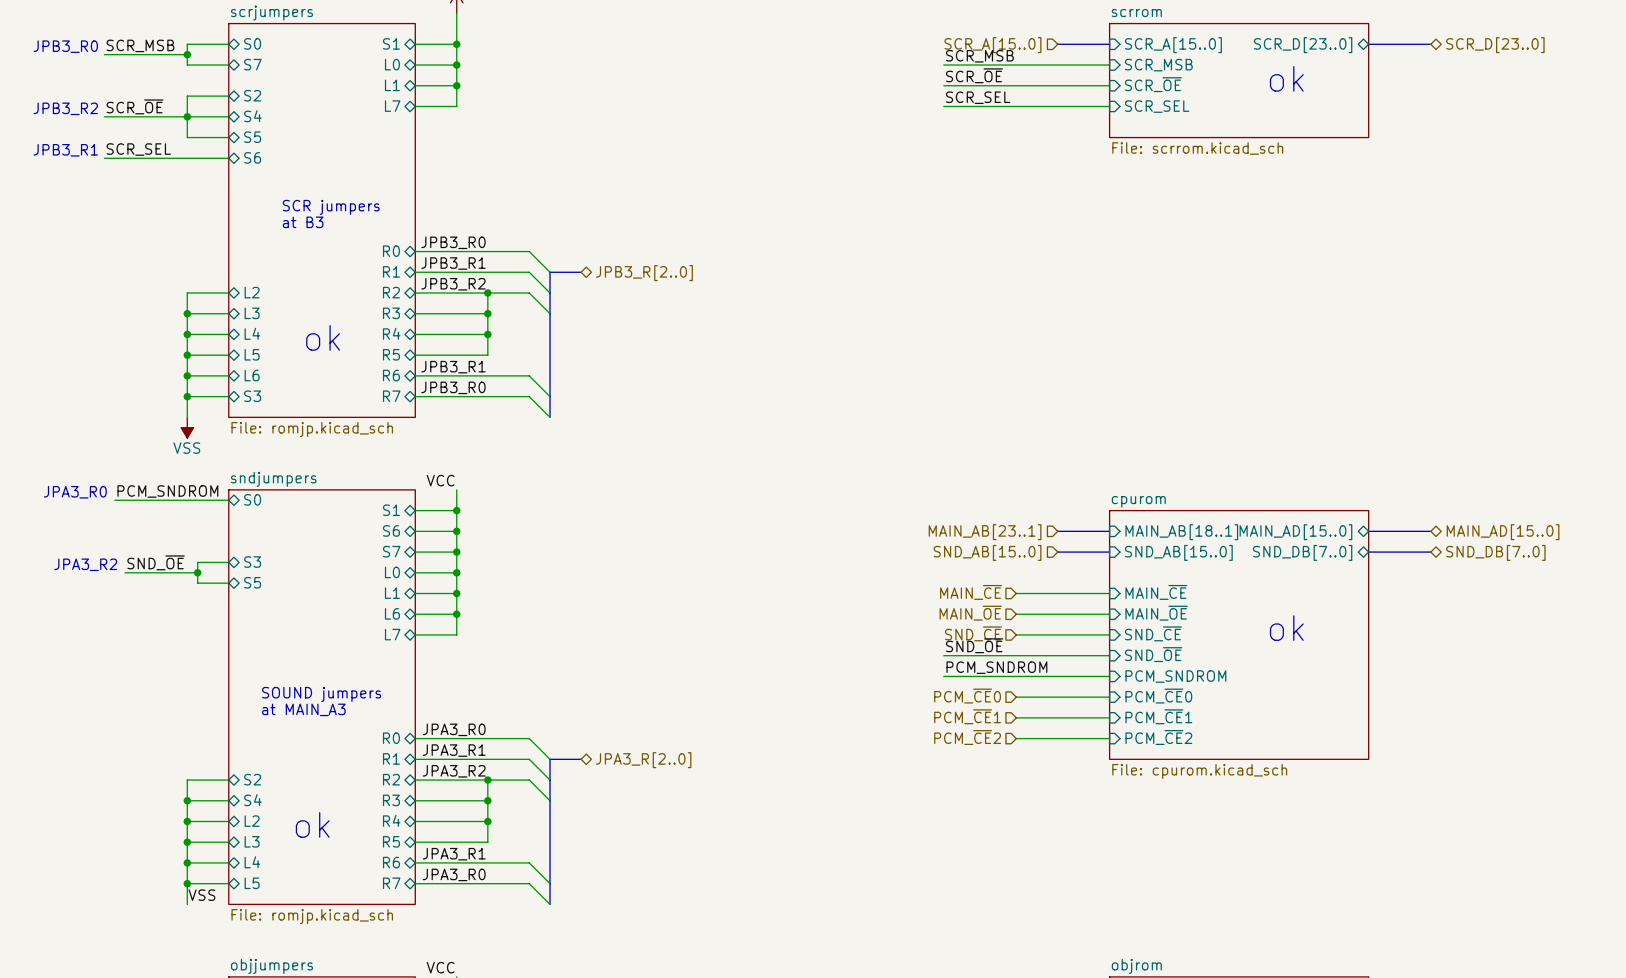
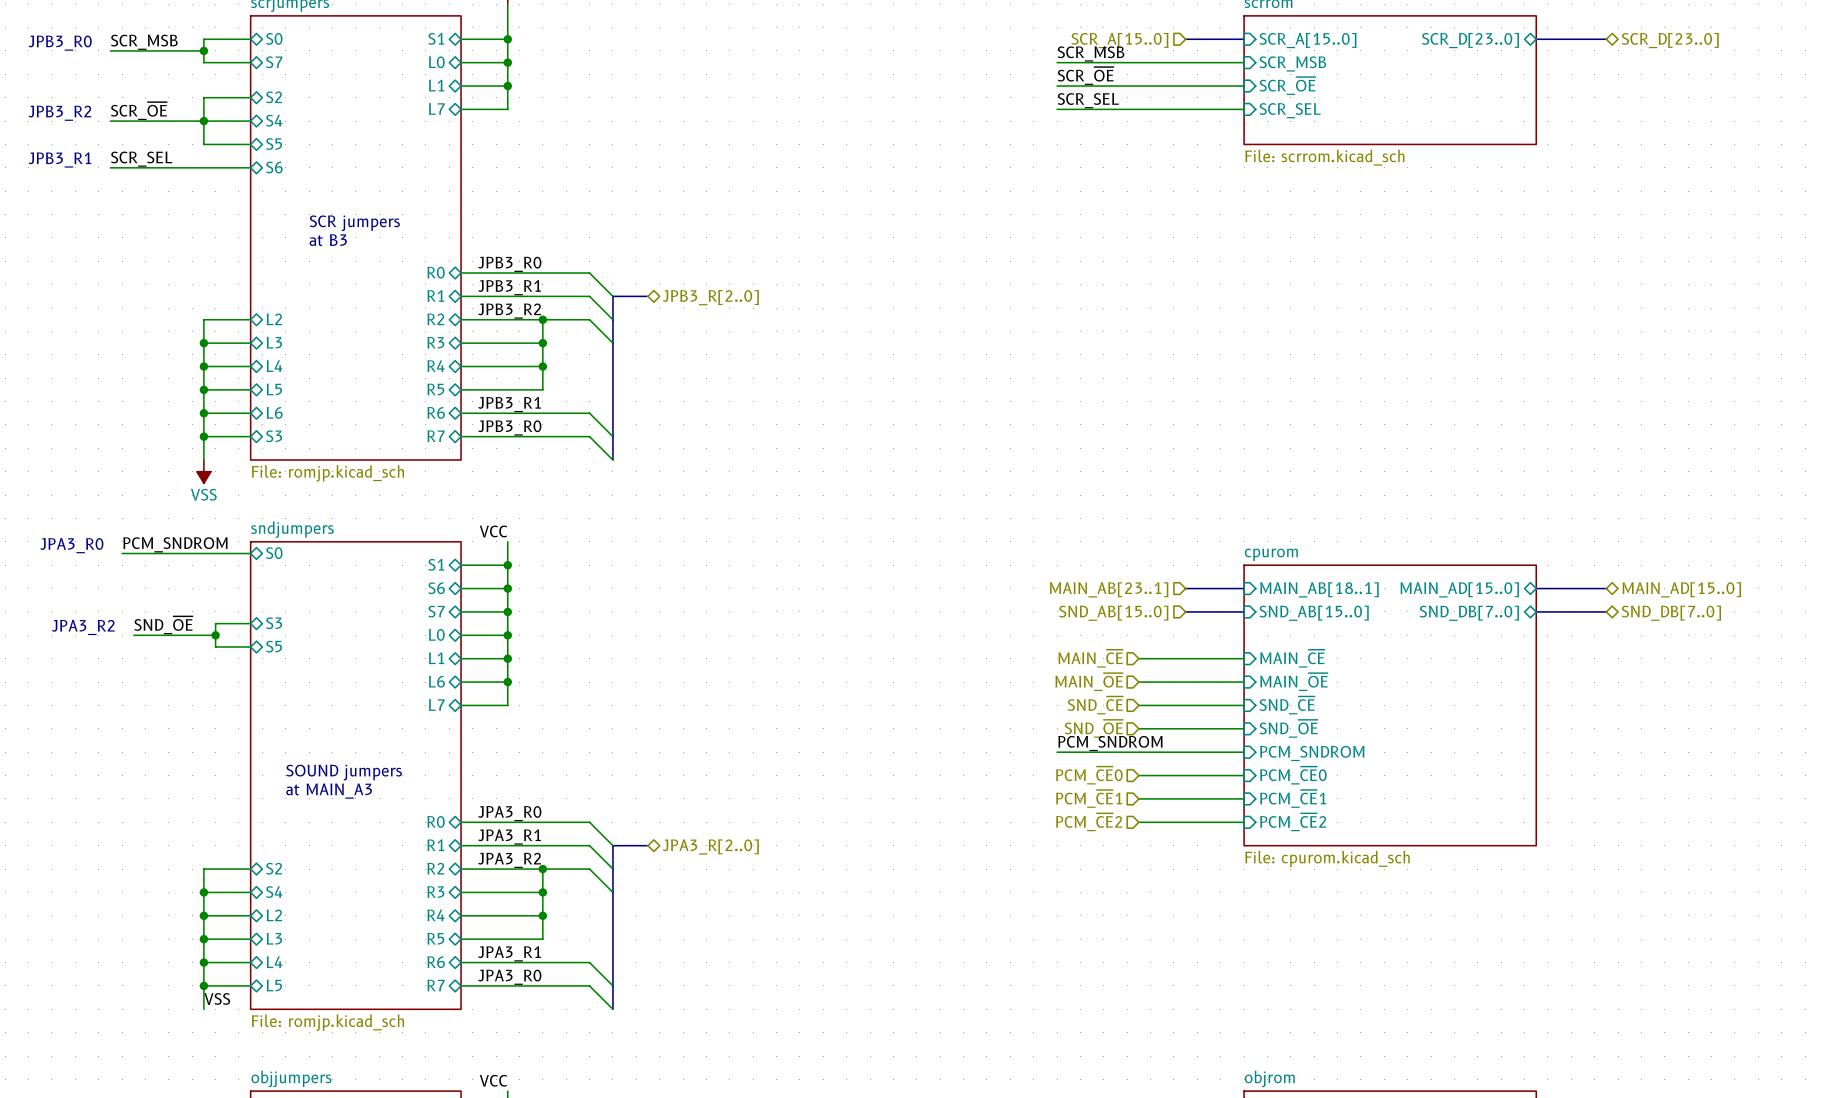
text: ok (1286, 78) -> none
text: ok (323, 337) -> none
text: ok (1286, 628) -> none
label: SND_~{OE} (974, 645) -> none
hierarchical label: none -> SND_~{OE} (1093, 728)
wire: (943, 655) (1016, 655) -> none
text: ok (312, 824) -> none

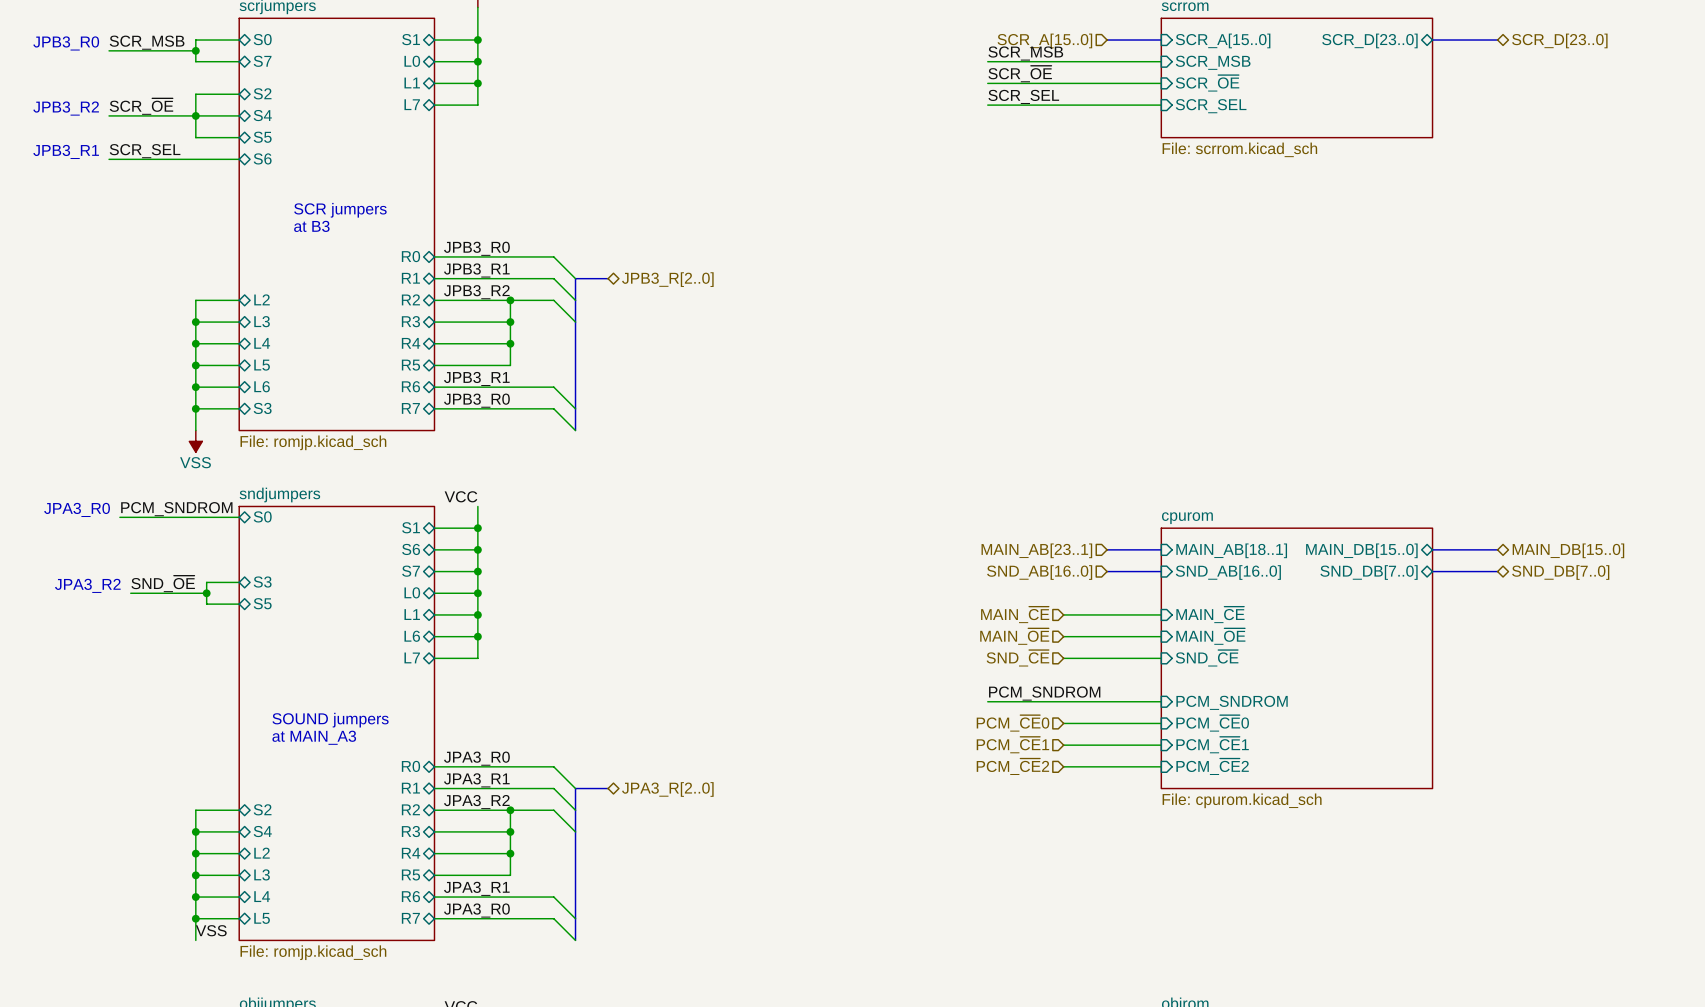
sheet pin: MAIN_AD[15..0] (1459, 589) -> MAIN_DB[15..0] (1361, 550)
hierarchical label: MAIN_AD[15..0] (1681, 589) -> MAIN_DB[15..0] (1568, 550)
hierarchical label: SND_AB[15..0] (1113, 613) -> SND_AB[16..0] (1039, 572)
sheet pin: SND_AB[15..0] (1314, 613) -> SND_AB[16..0] (1228, 572)
hierarchical label: SND_~{OE} (1093, 728) -> none
wire: (1138, 728) (1244, 728) -> none
sheet pin: SND_~{OE} (1288, 728) -> none

